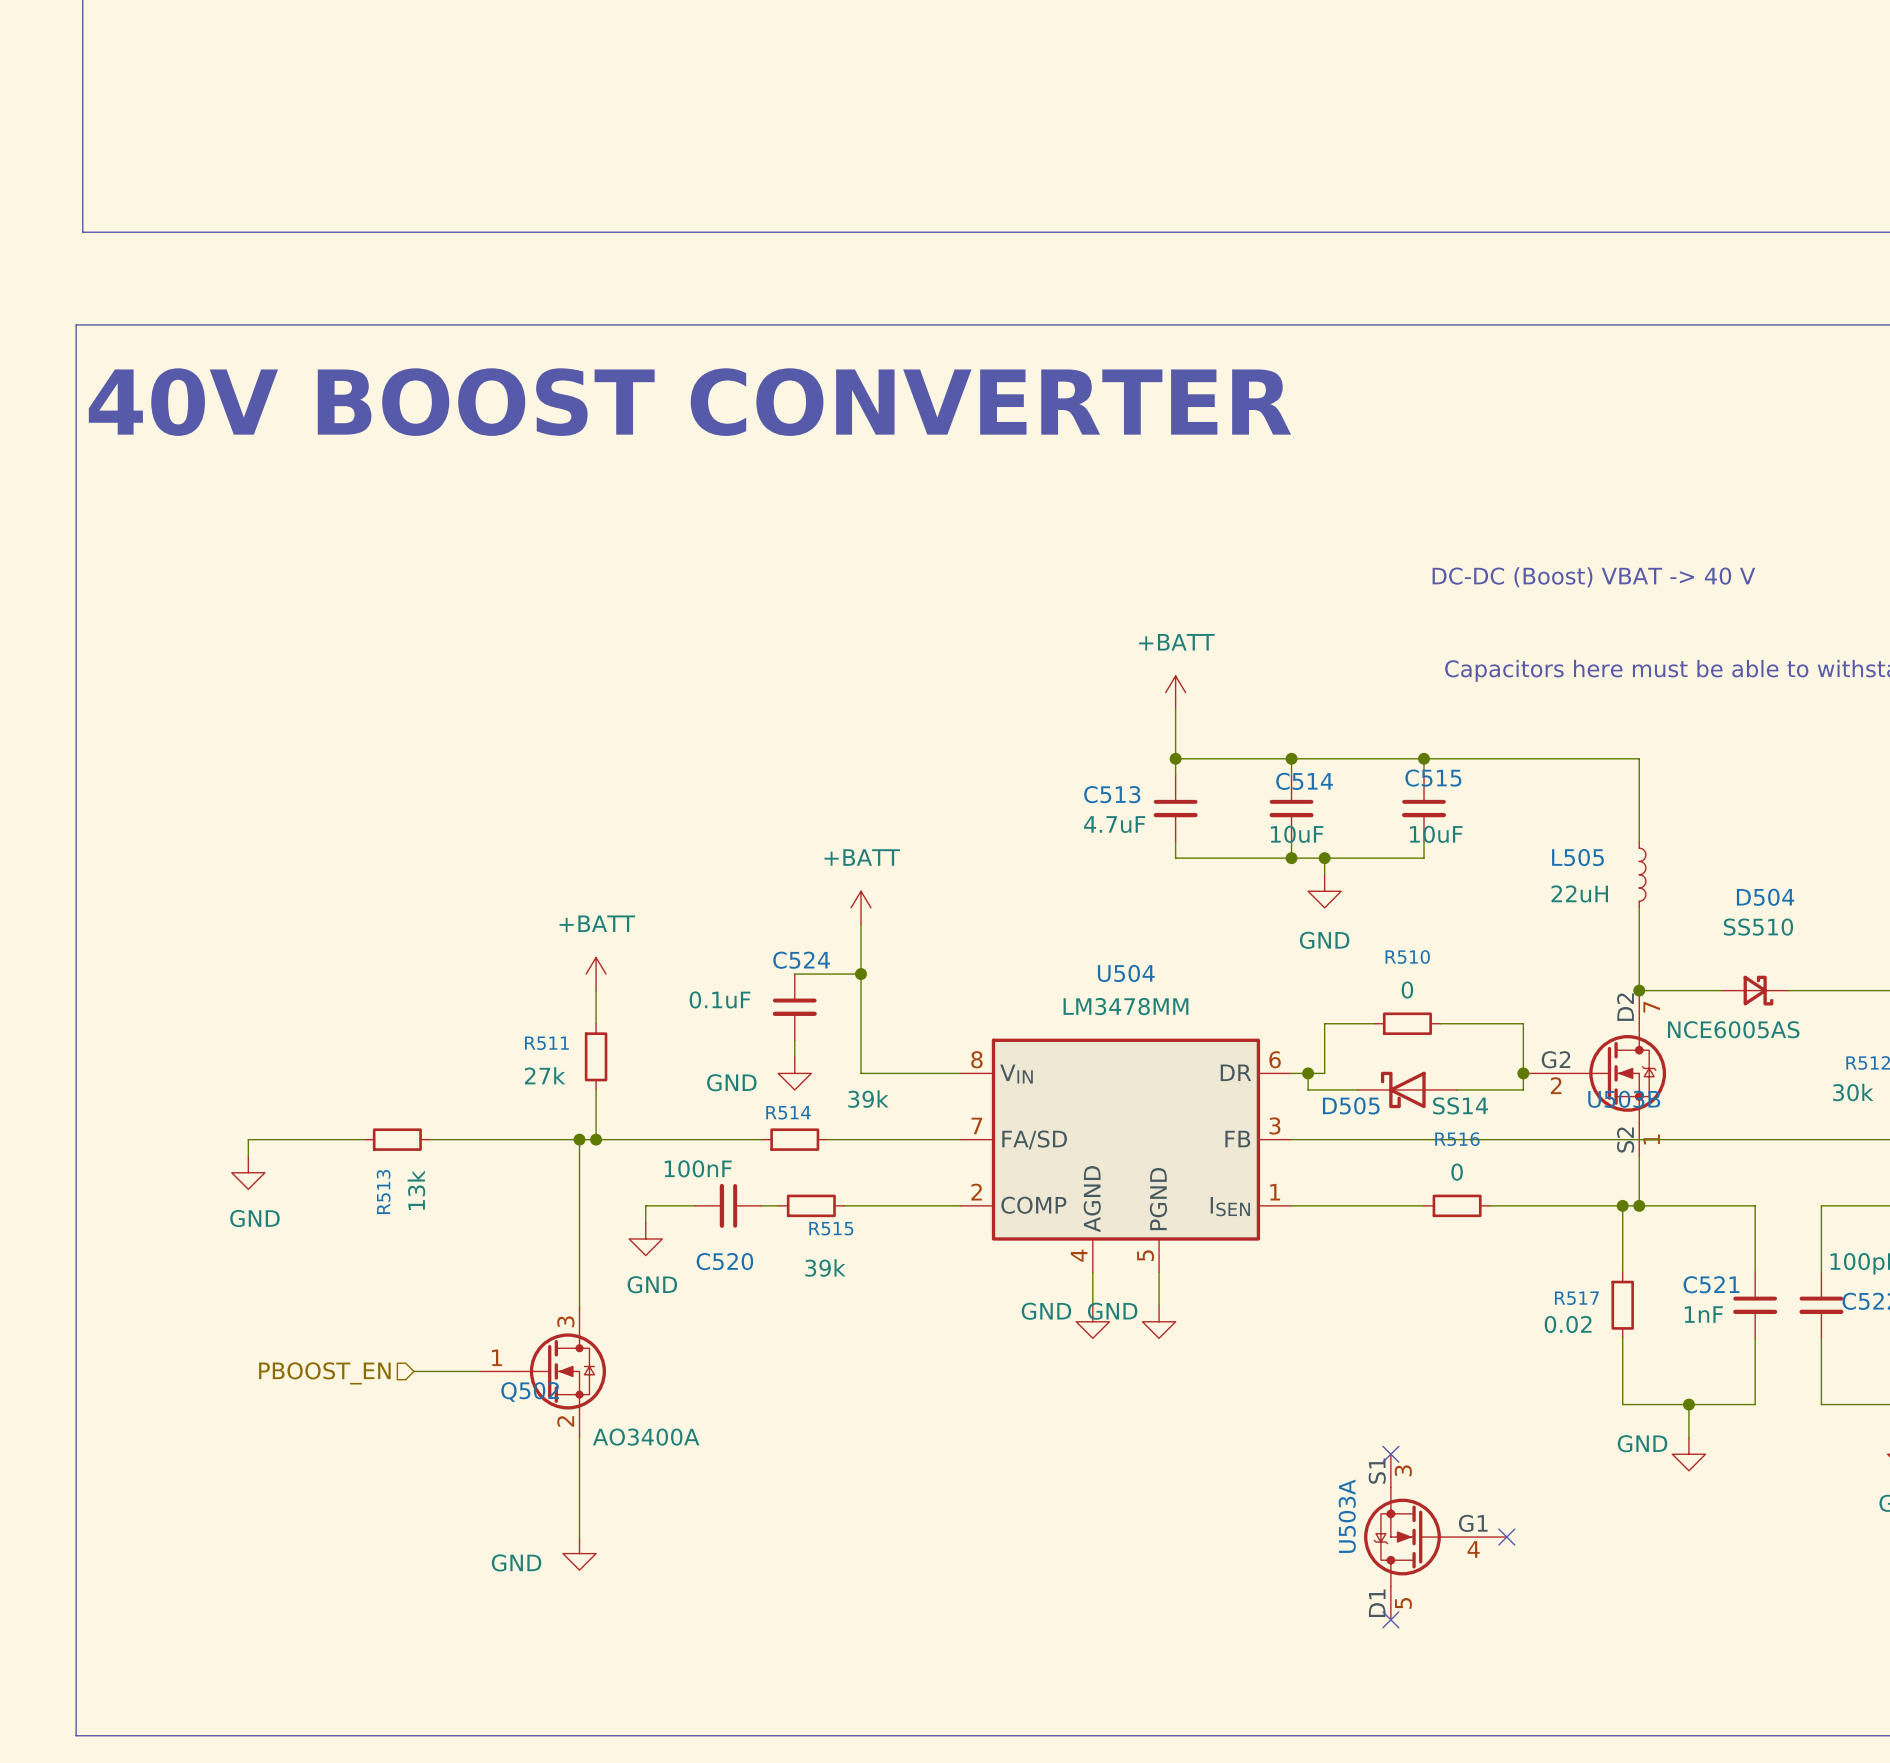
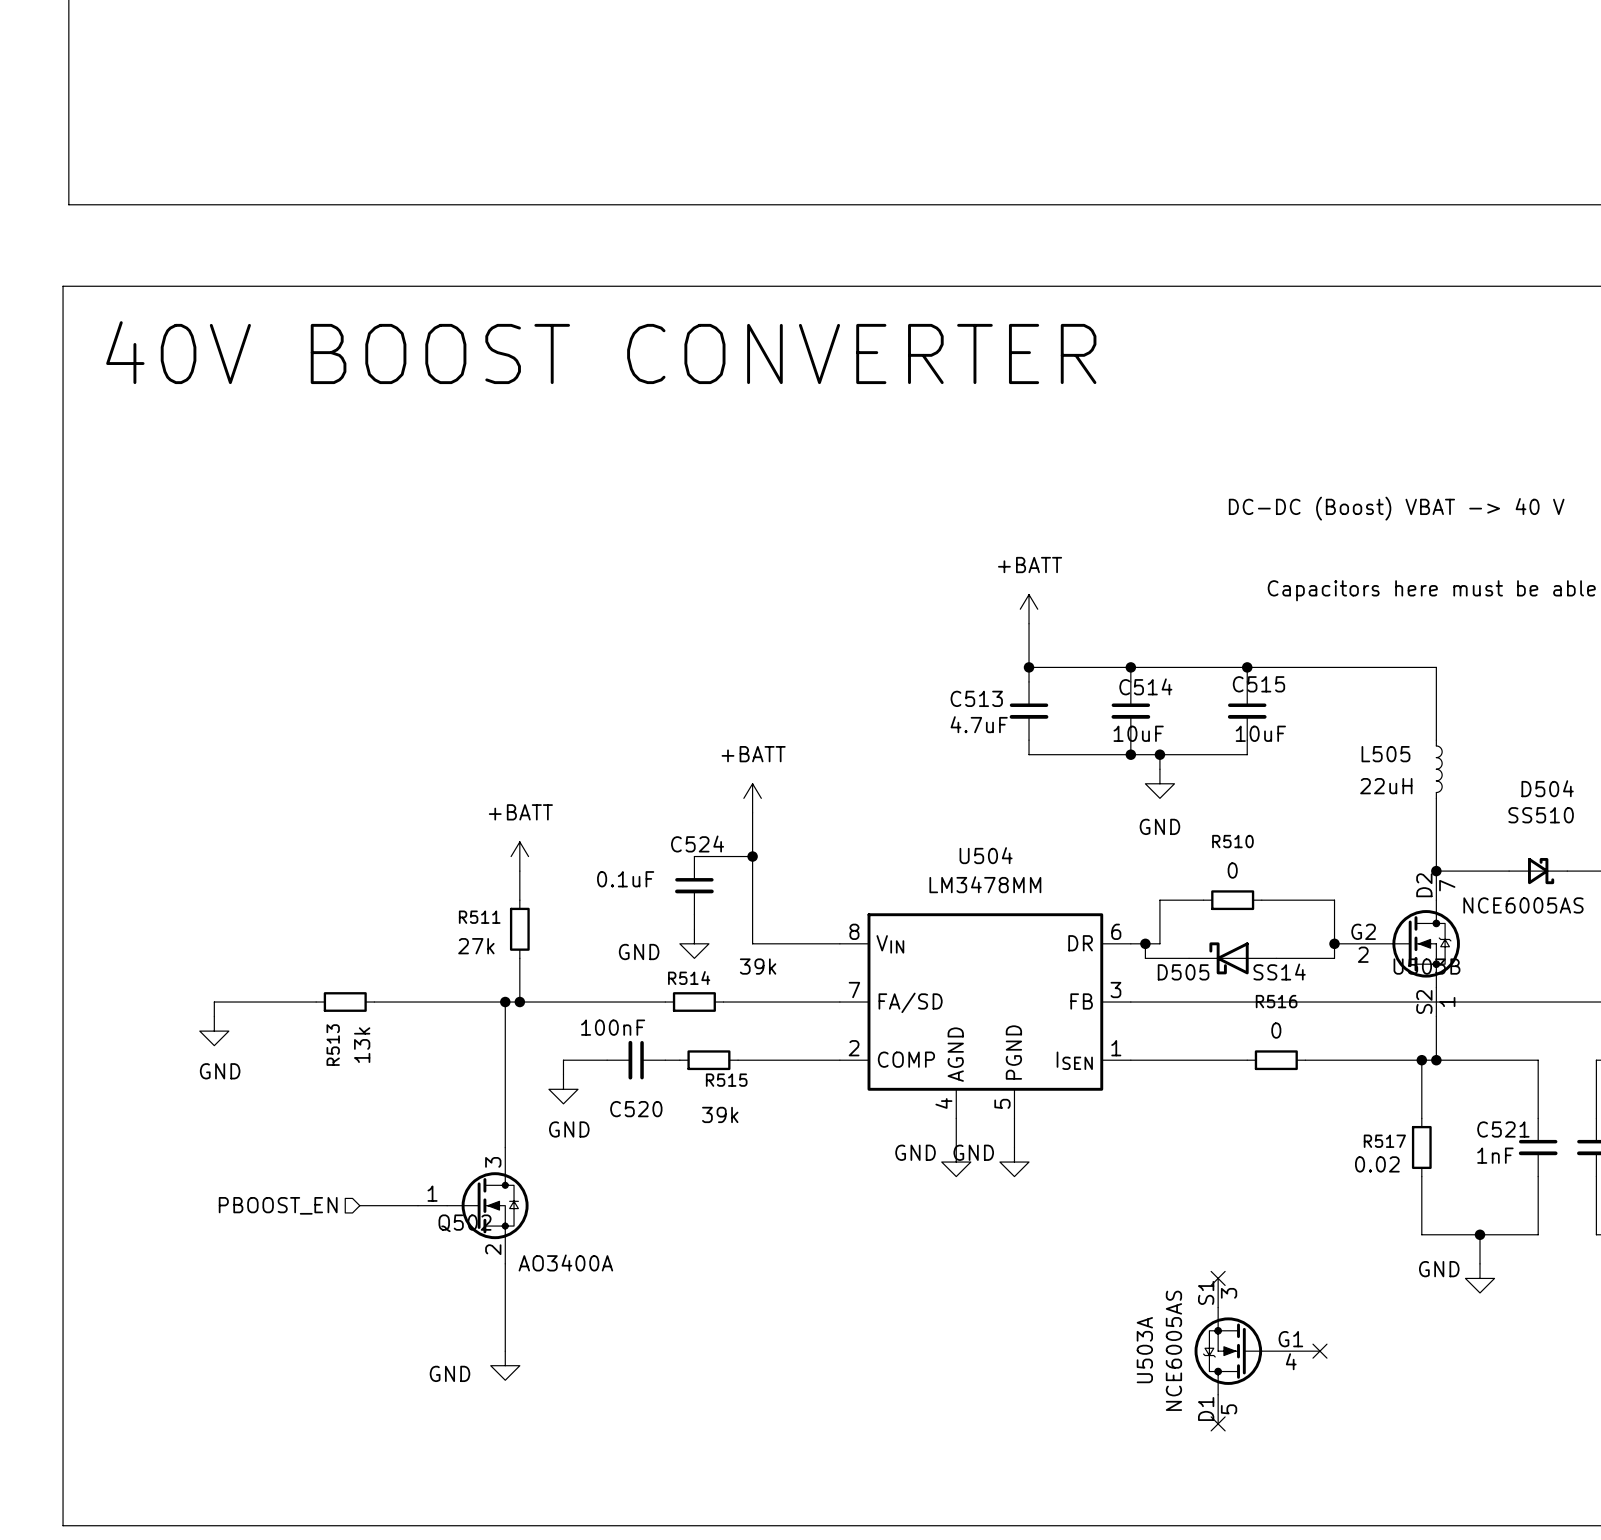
U503A name position: U503A (1347, 1516) -> U503A (1144, 1350)
U503A value: none -> NCE6005AS (1173, 1350)

